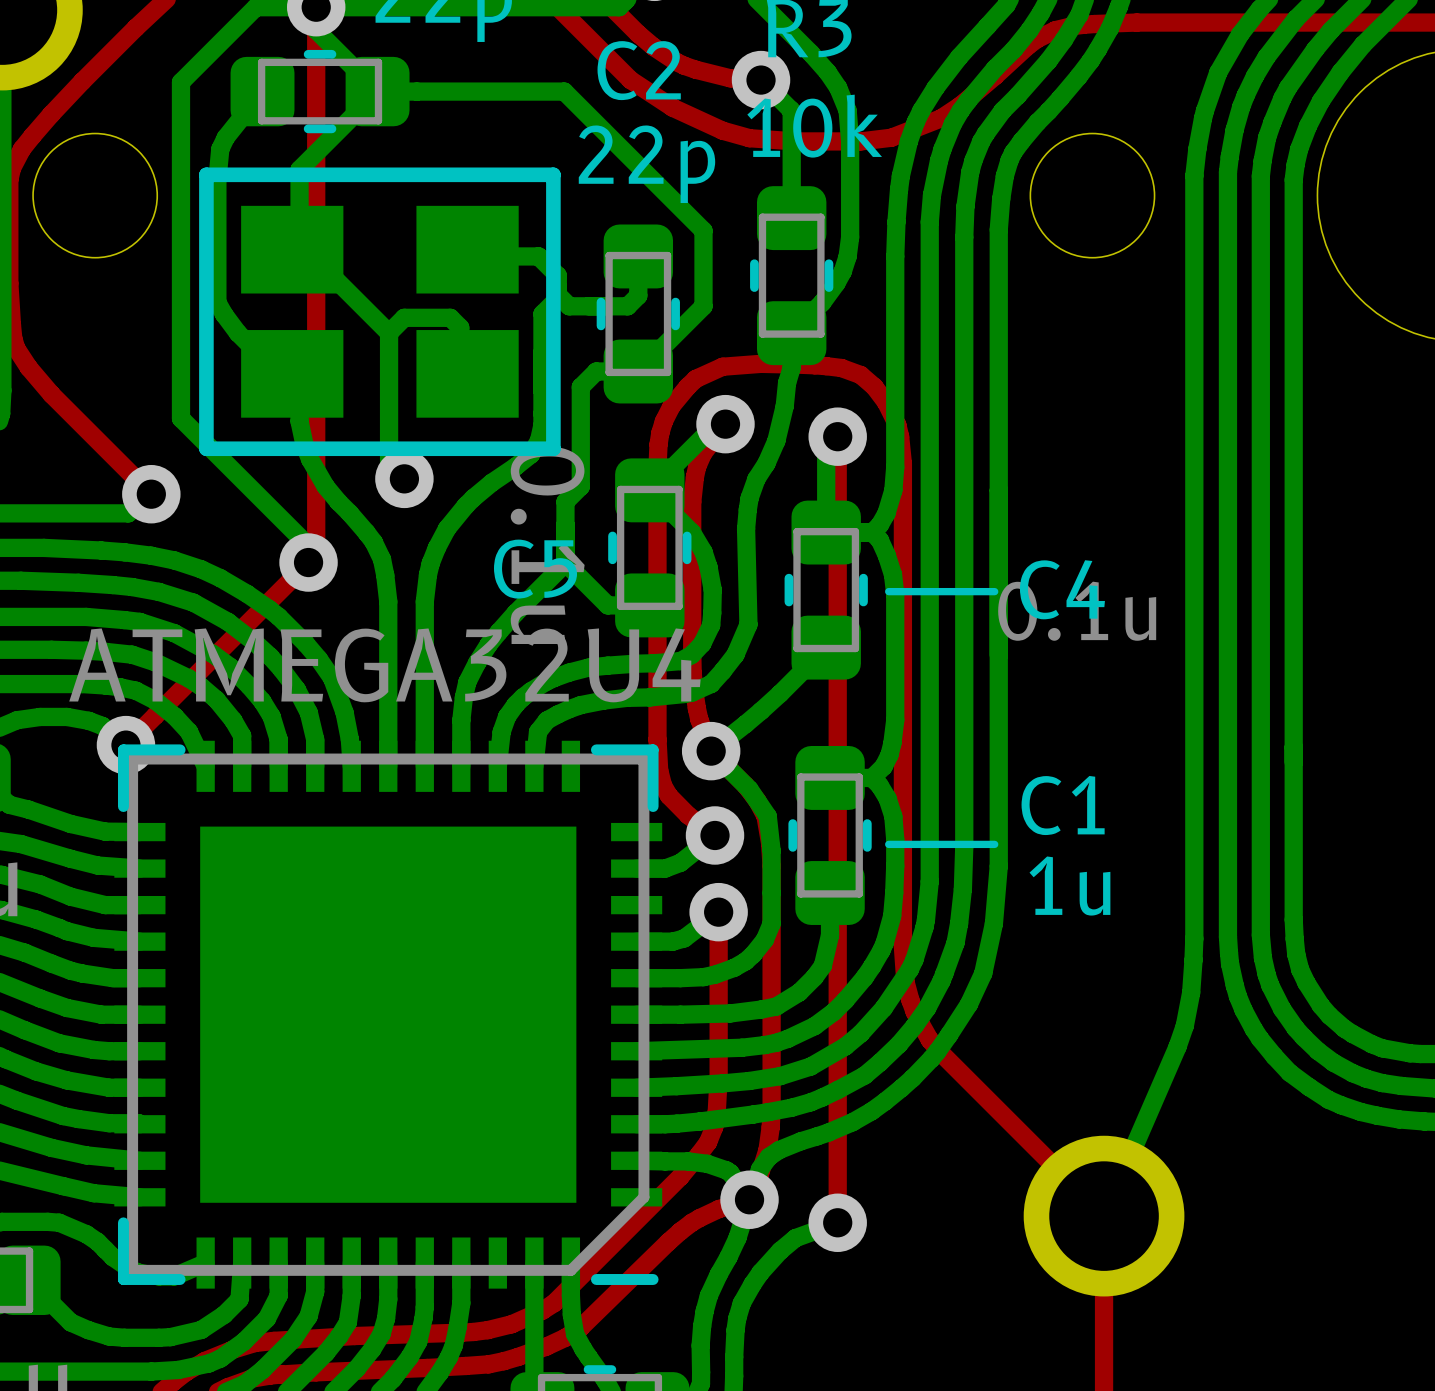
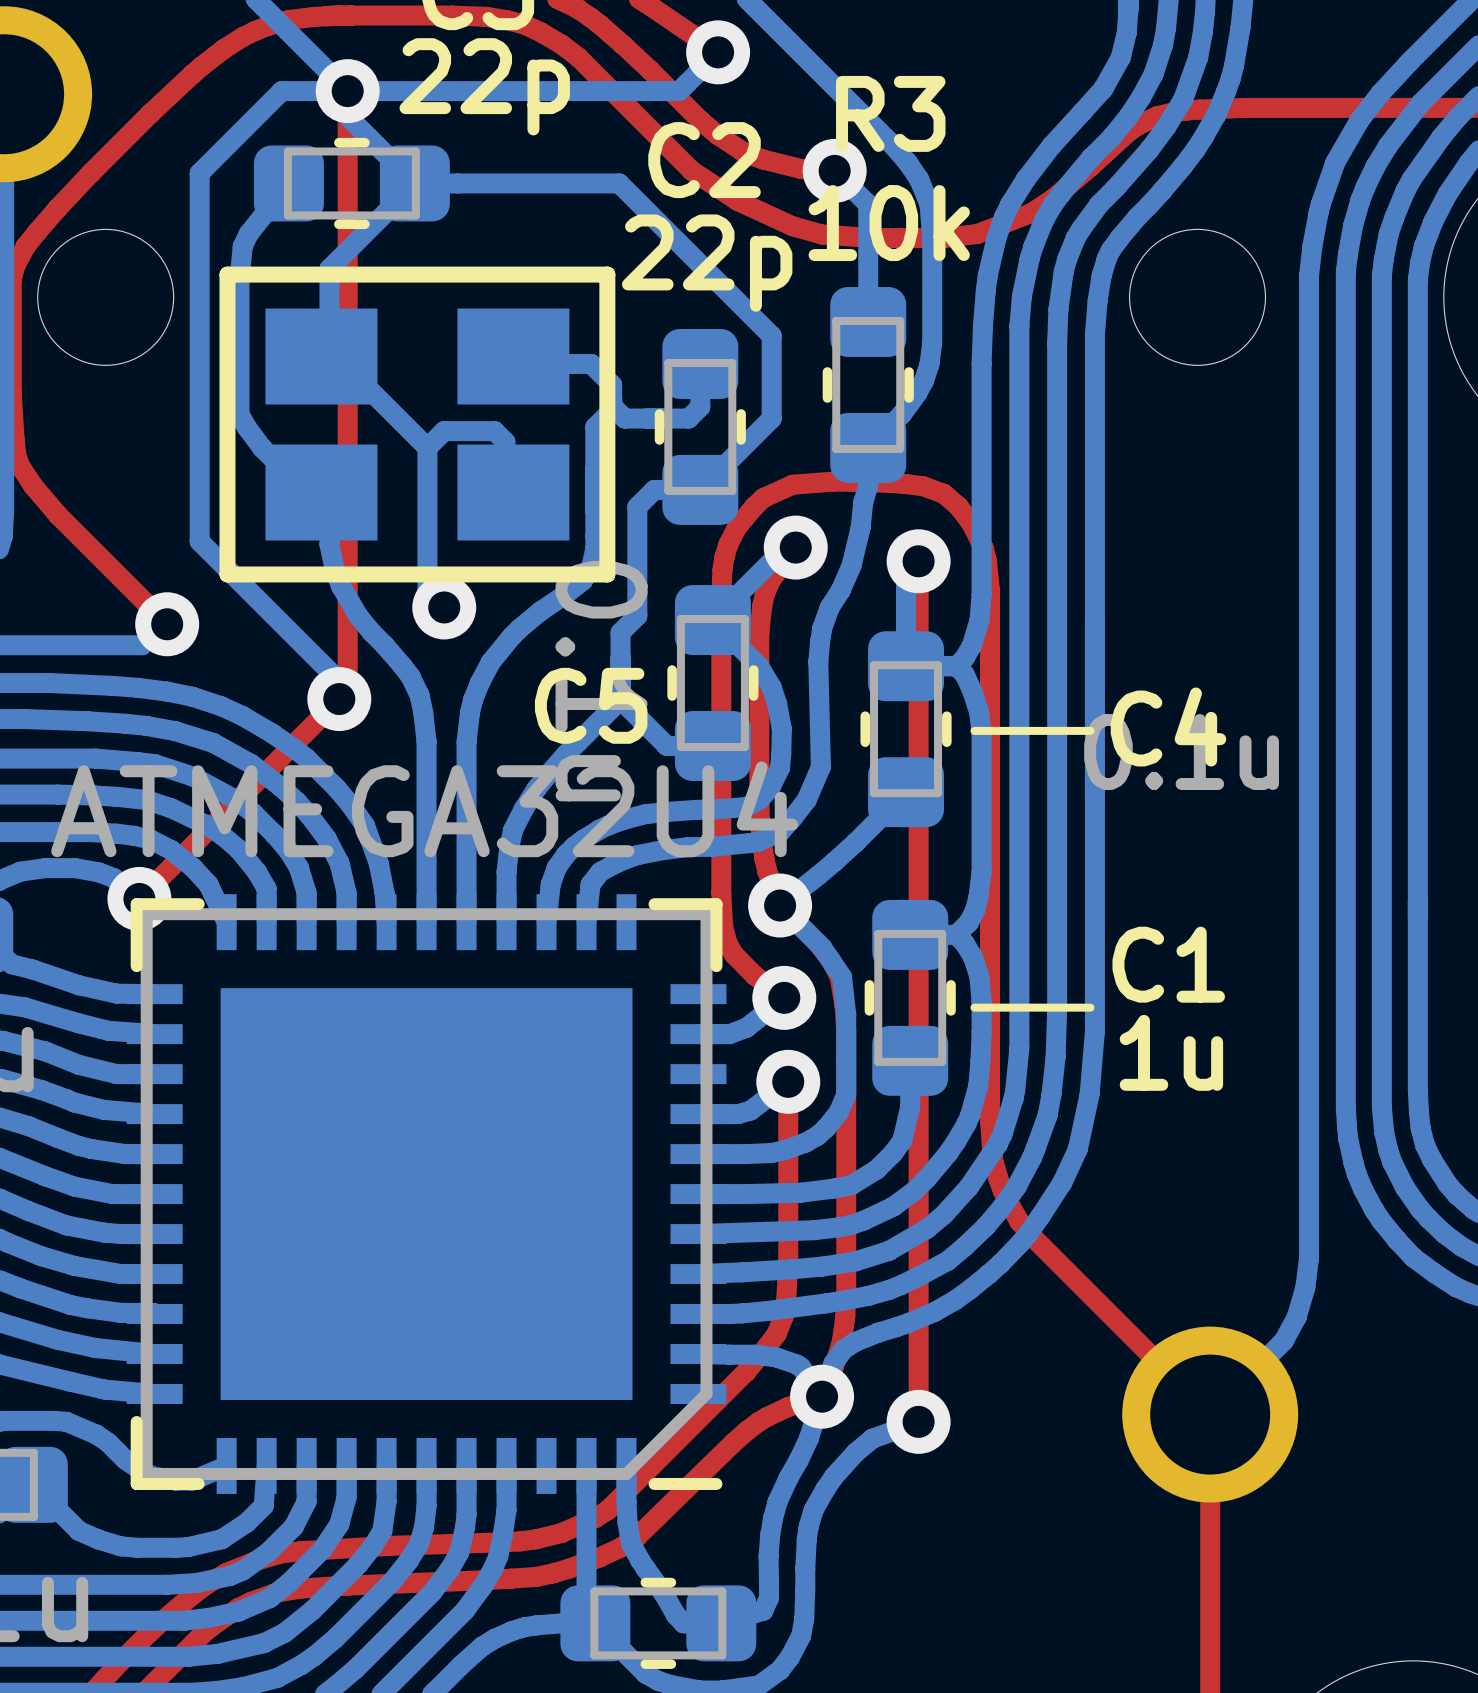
bottom track: (1194, 938) (1191, 992) (1184, 1025) (1177, 1046) (1104, 1216) -> (1309, 1111) (1309, 1258) (1305, 1287) (1296, 1316) (1283, 1340) (1210, 1414)

